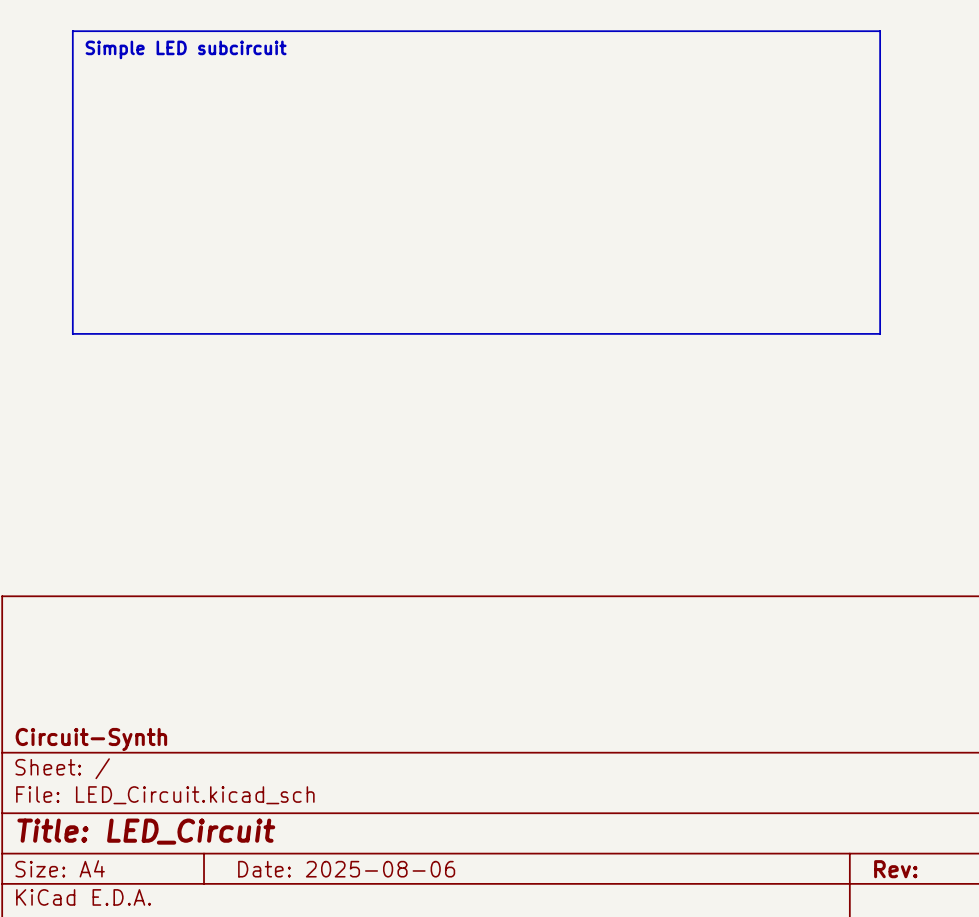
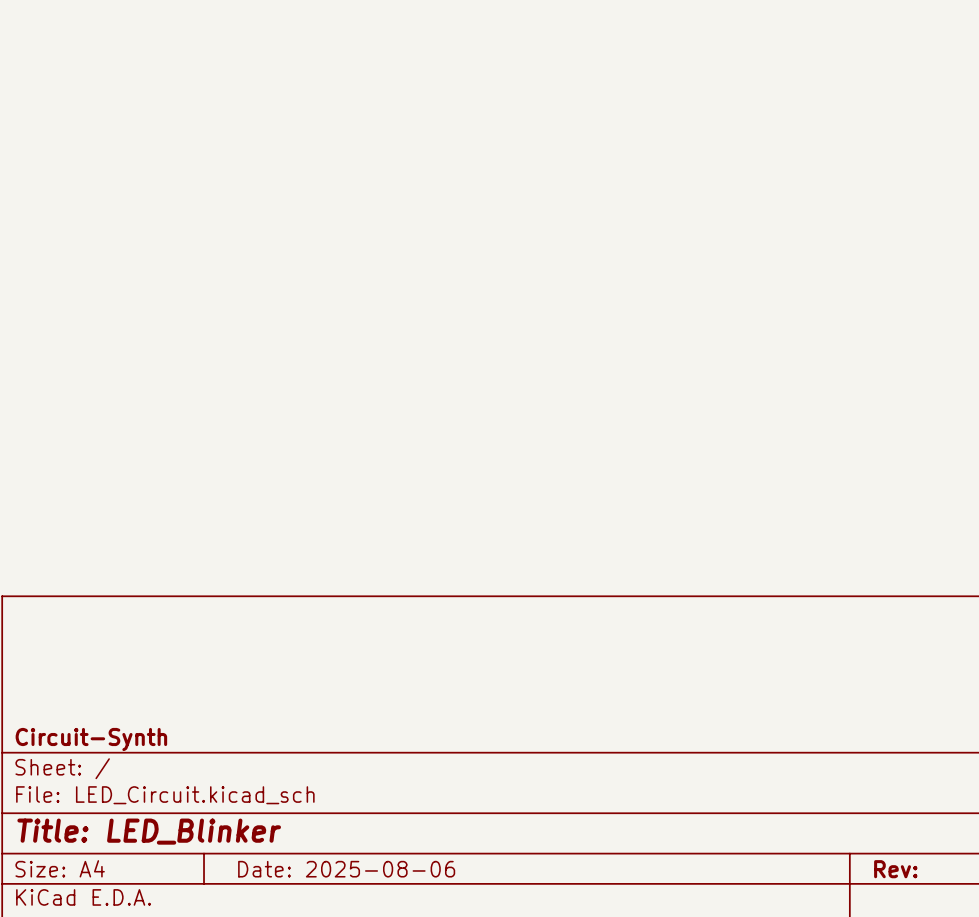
line: (72, 31) (880, 31) (880, 333) (72, 333) (72, 31) -> none
text: Simple LED subcircuit (186, 49) -> none
title block: Title: LED_Circuit (146, 831) -> Title: LED_Blinker (149, 831)

